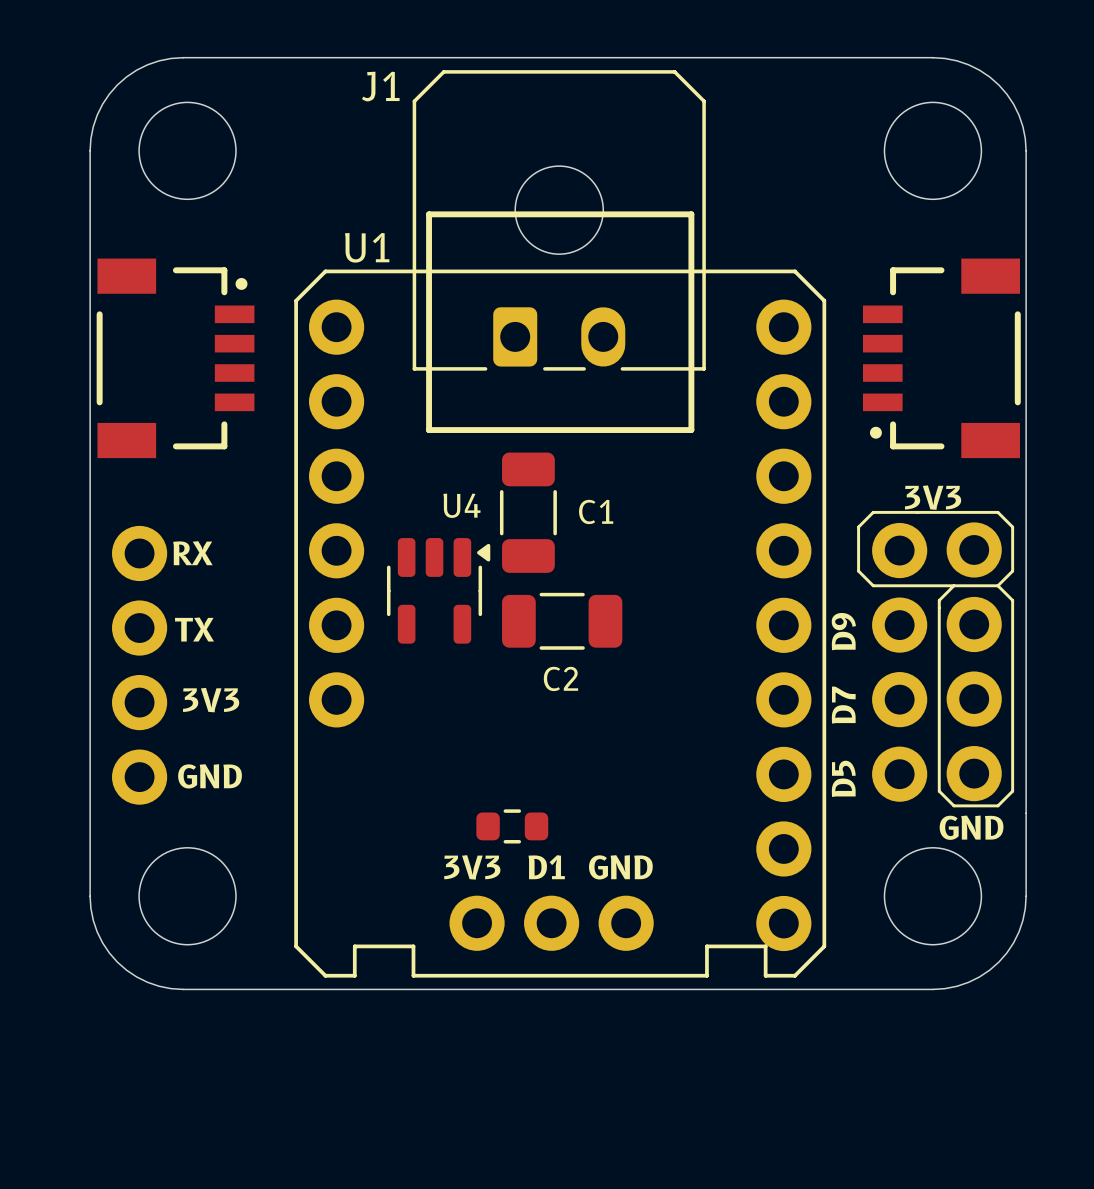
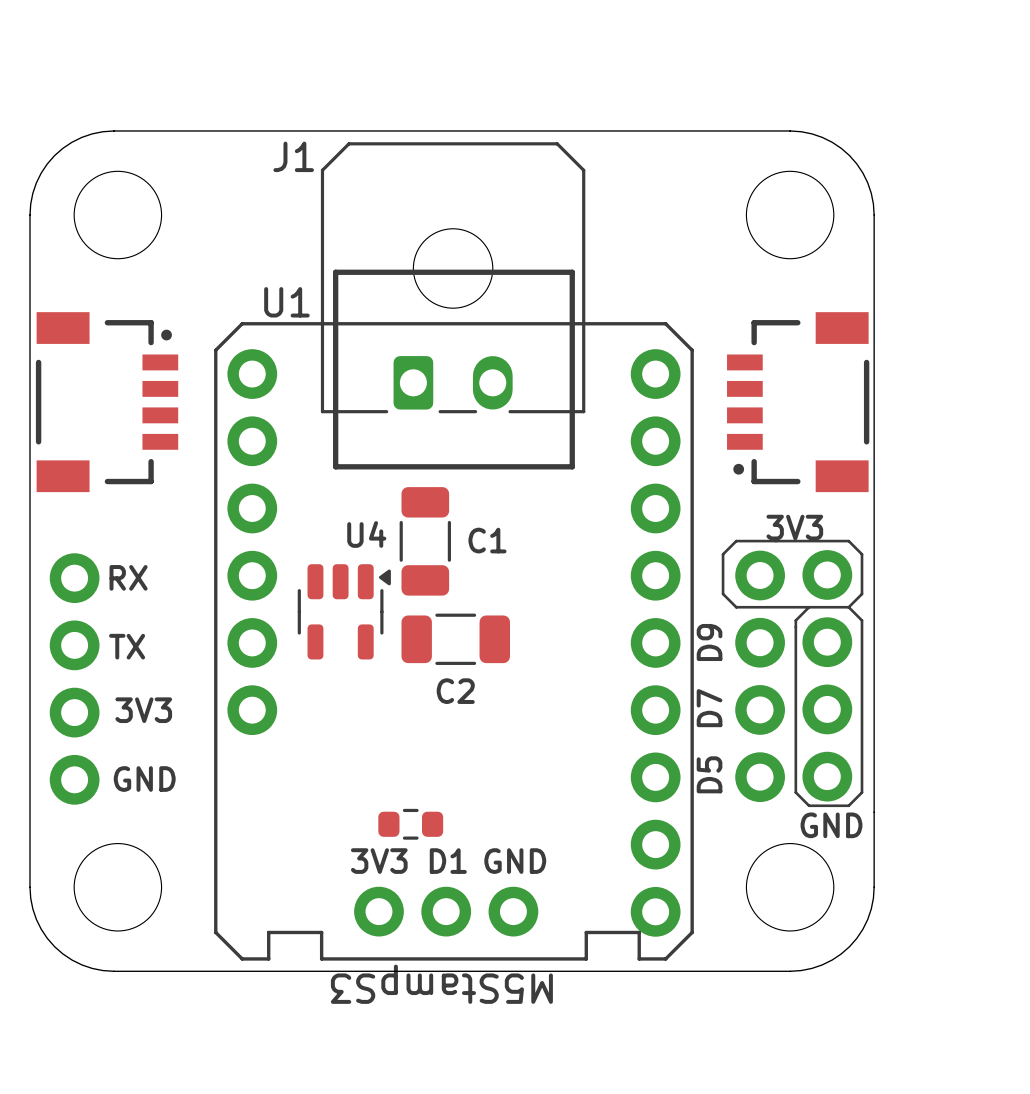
U1 value: none -> M5StampS3 (441, 984)

